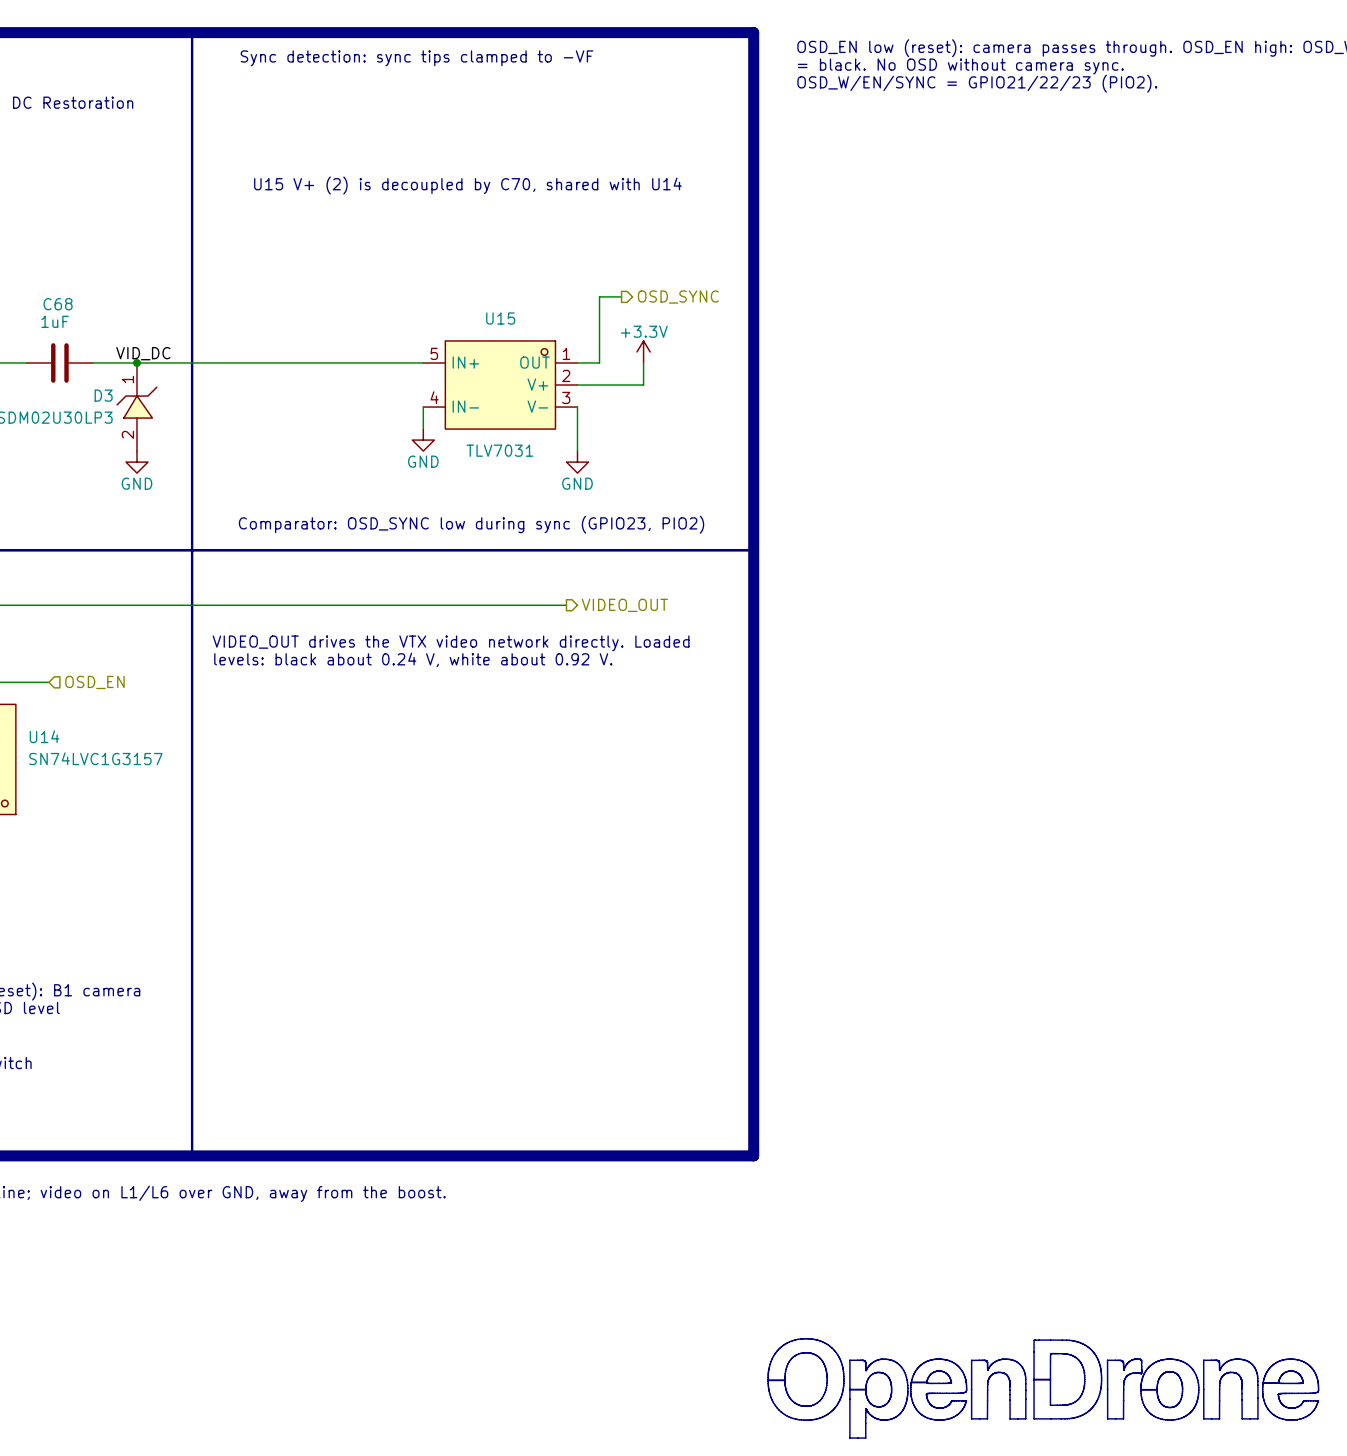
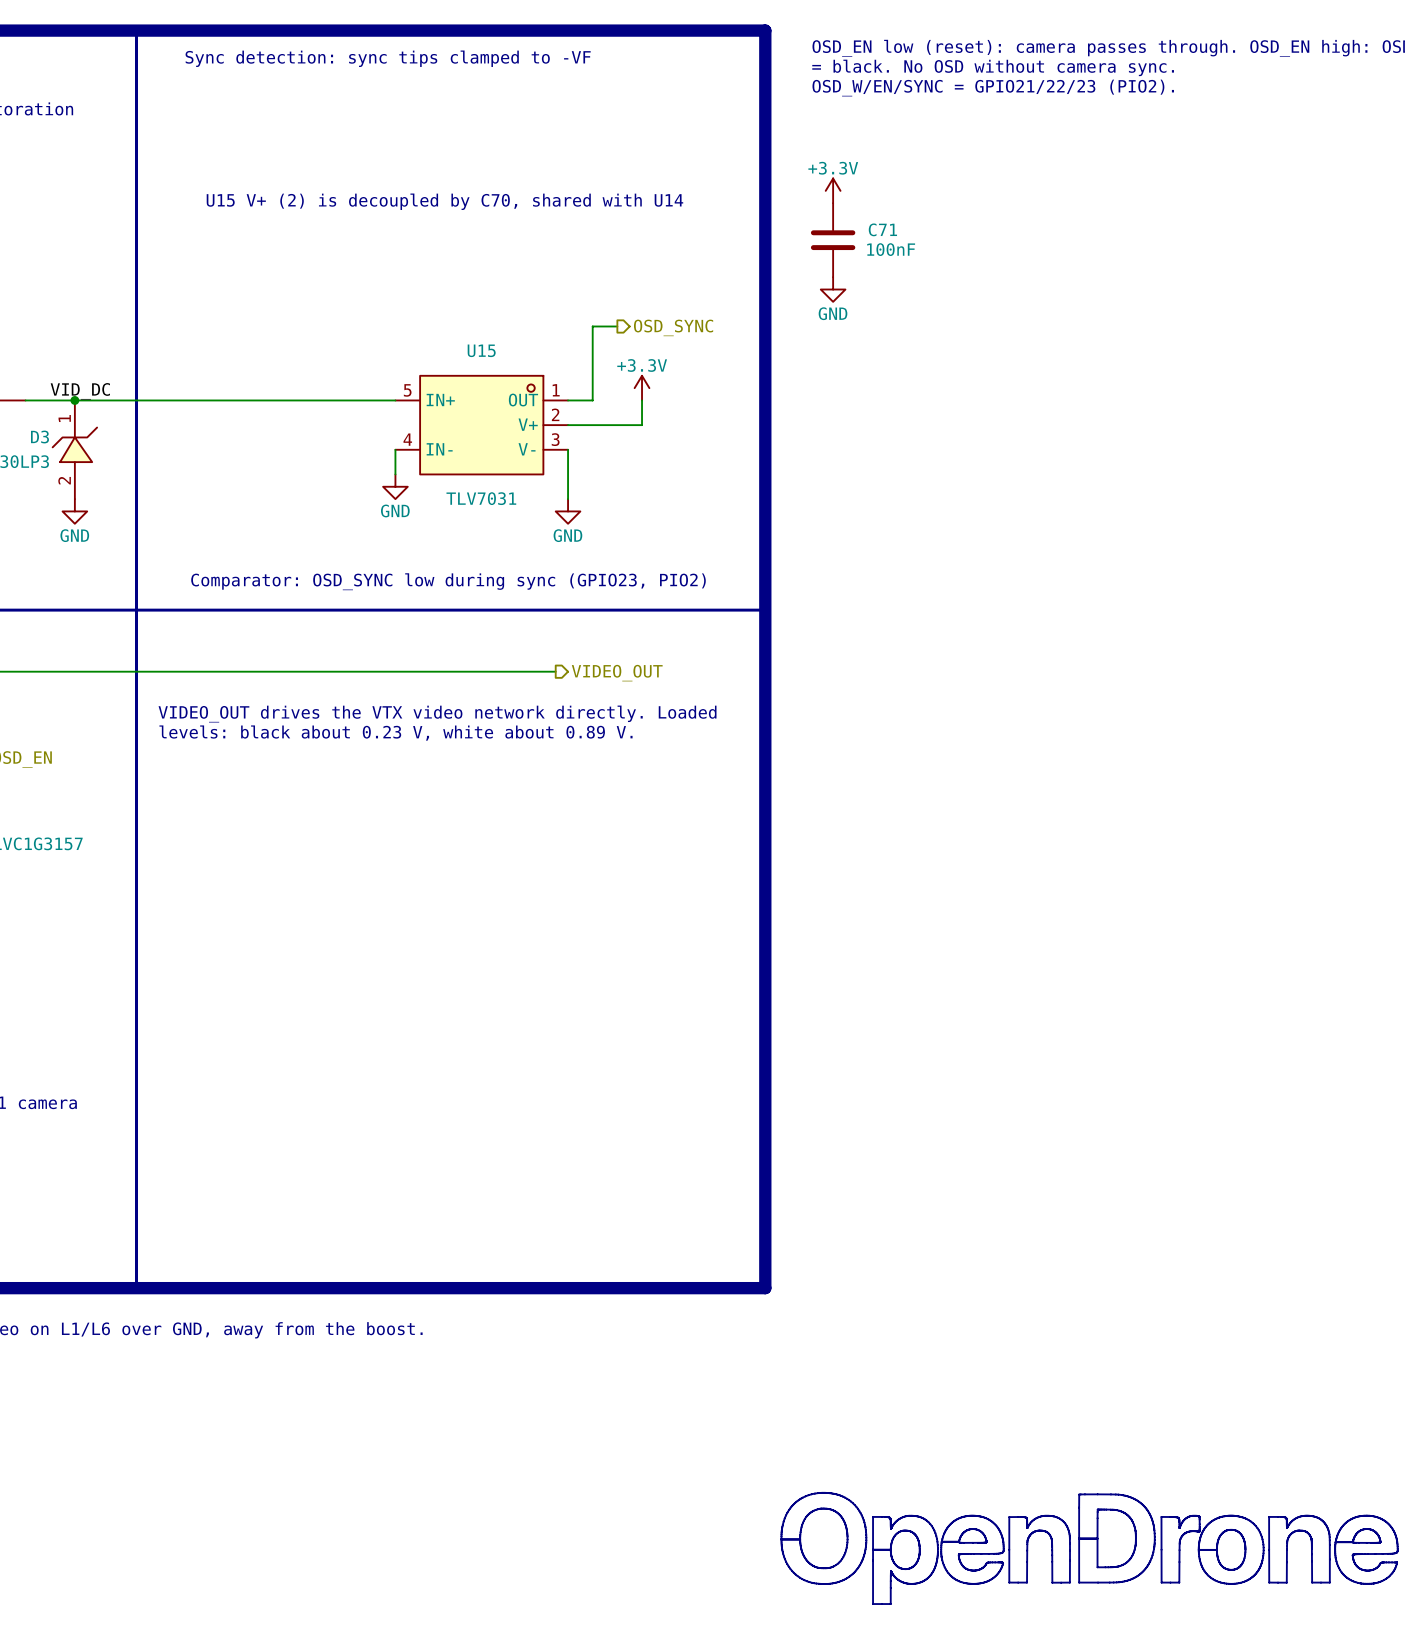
power symbol: none -> +3.3V (833, 190)
C71: none -> 100nF (833, 240)
power symbol: none -> GND (833, 289)
text: levels: black about 0.24 V, white about 0.92 V. (413, 659) -> levels: black about 0.23 V, white about 0.89 V. (395, 733)

